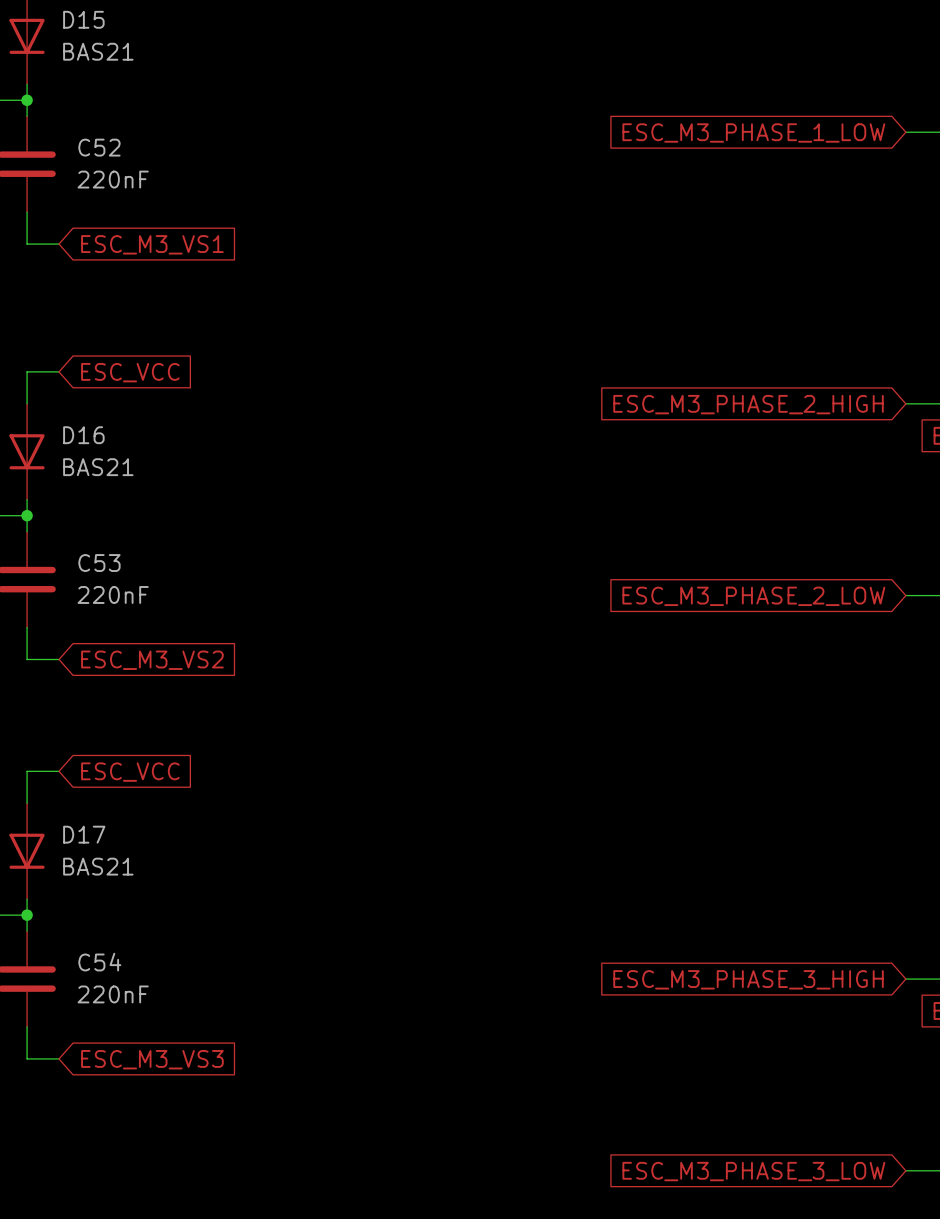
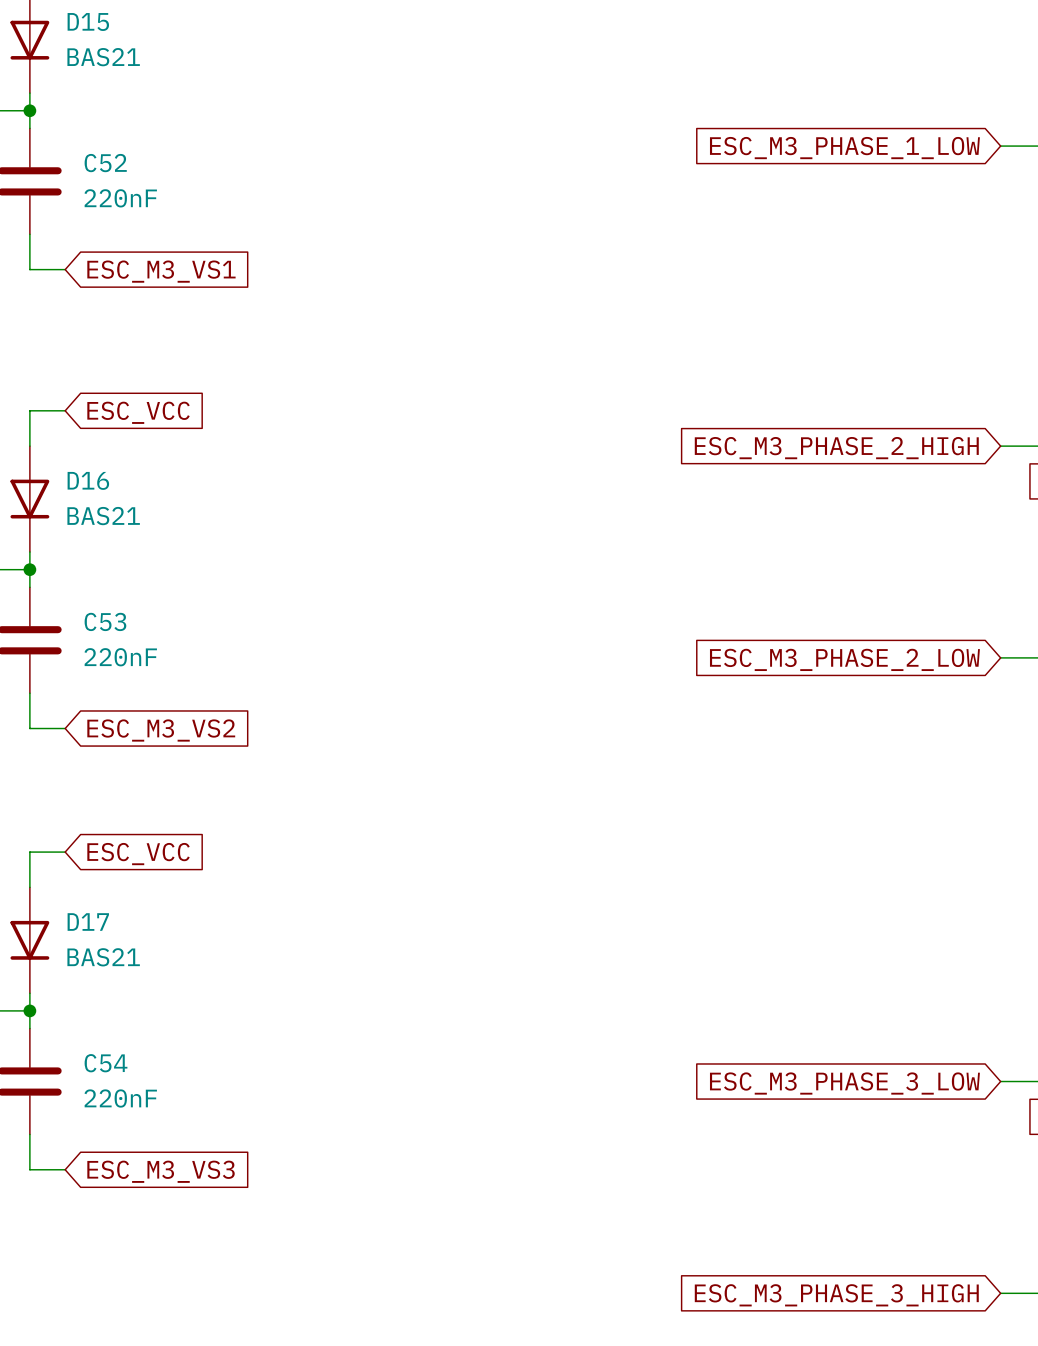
global label: ESC_M3_PHASE_3_HIGH (748, 979) -> ESC_M3_PHASE_3_LOW (844, 1083)
global label: ESC_M3_PHASE_3_LOW (753, 1171) -> ESC_M3_PHASE_3_HIGH (836, 1295)

